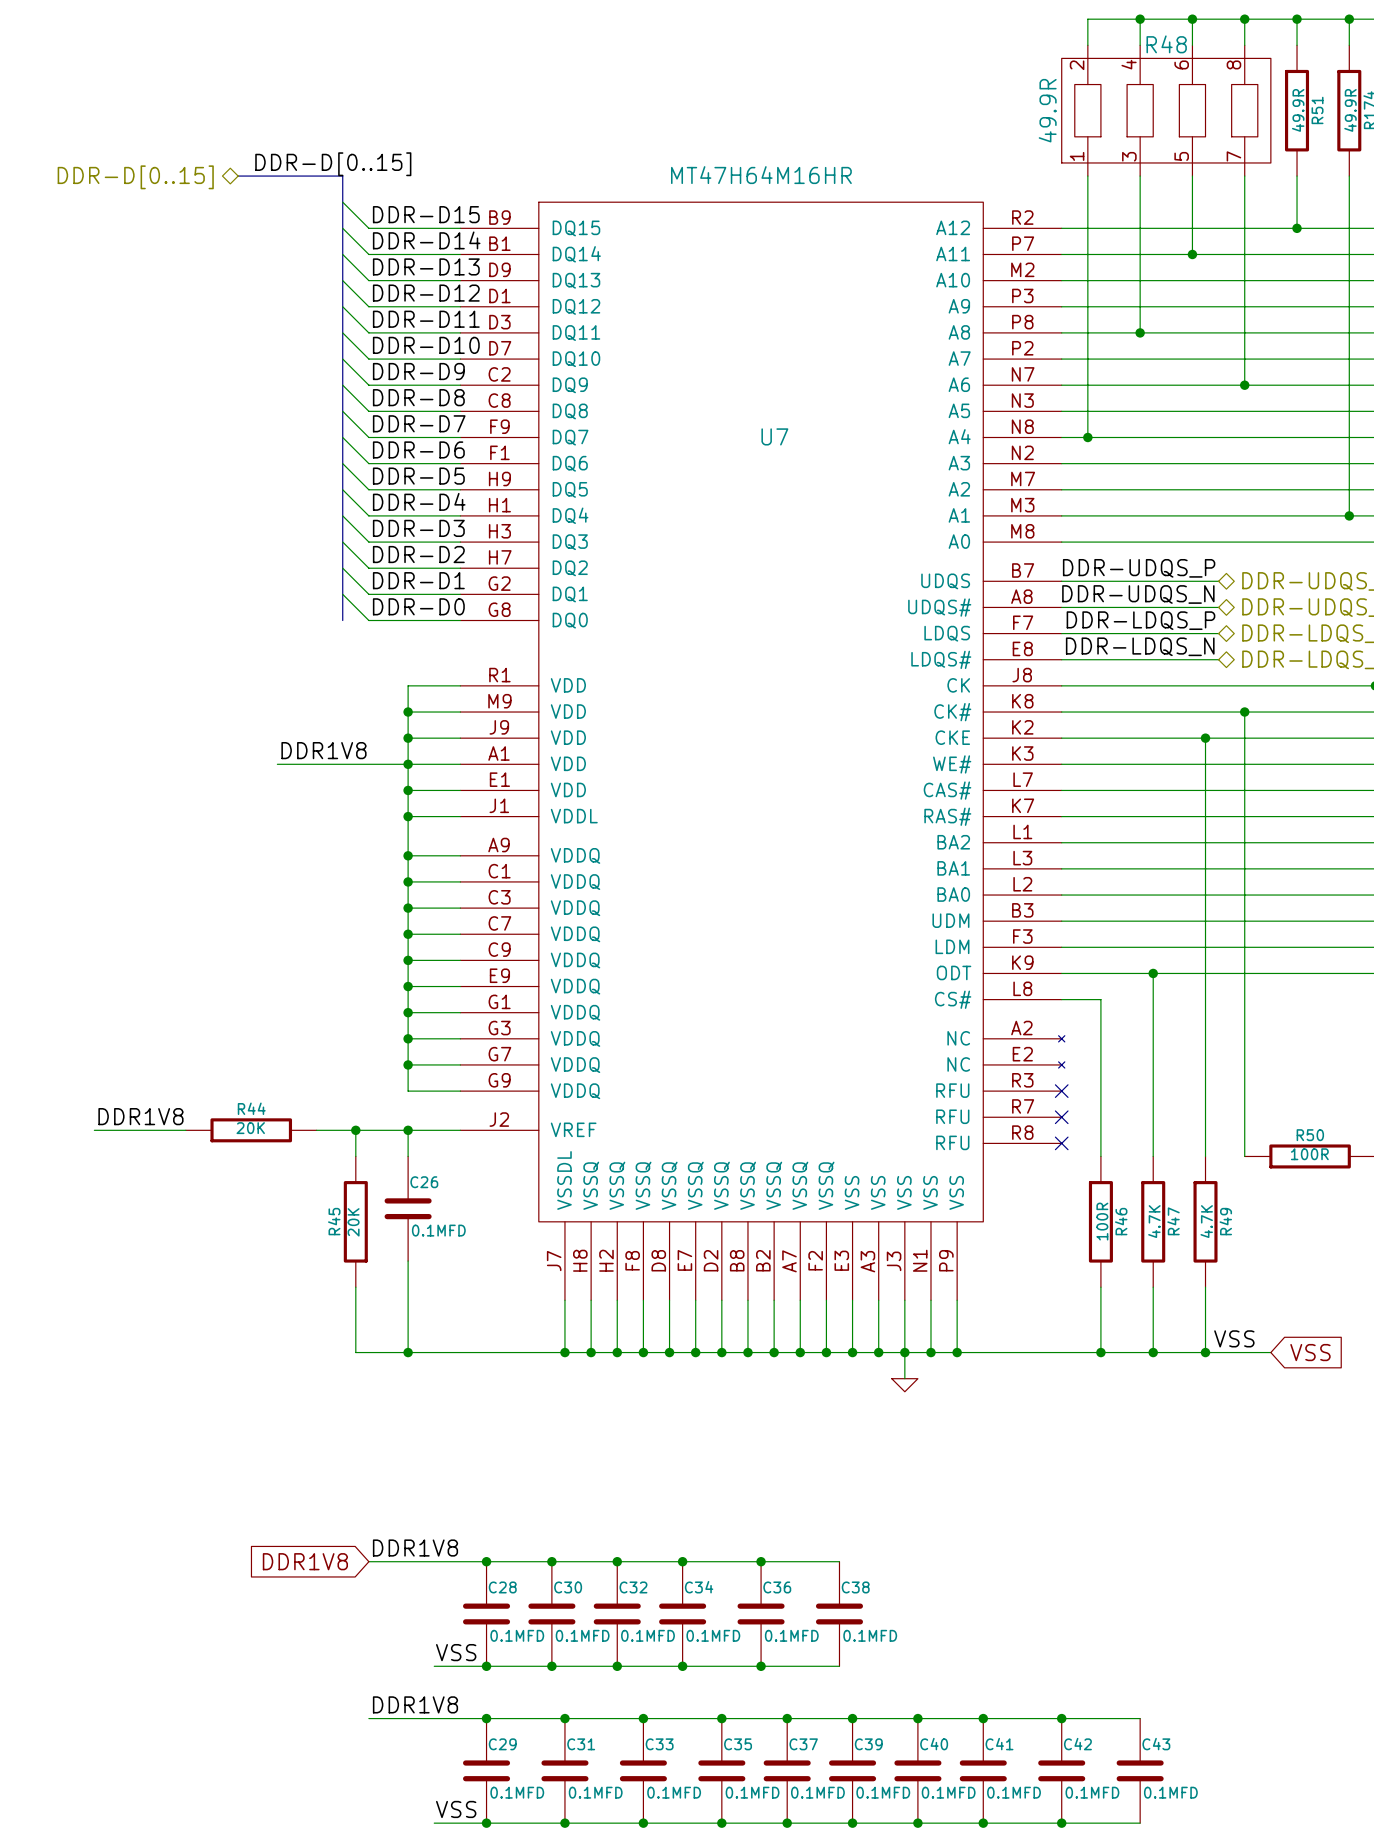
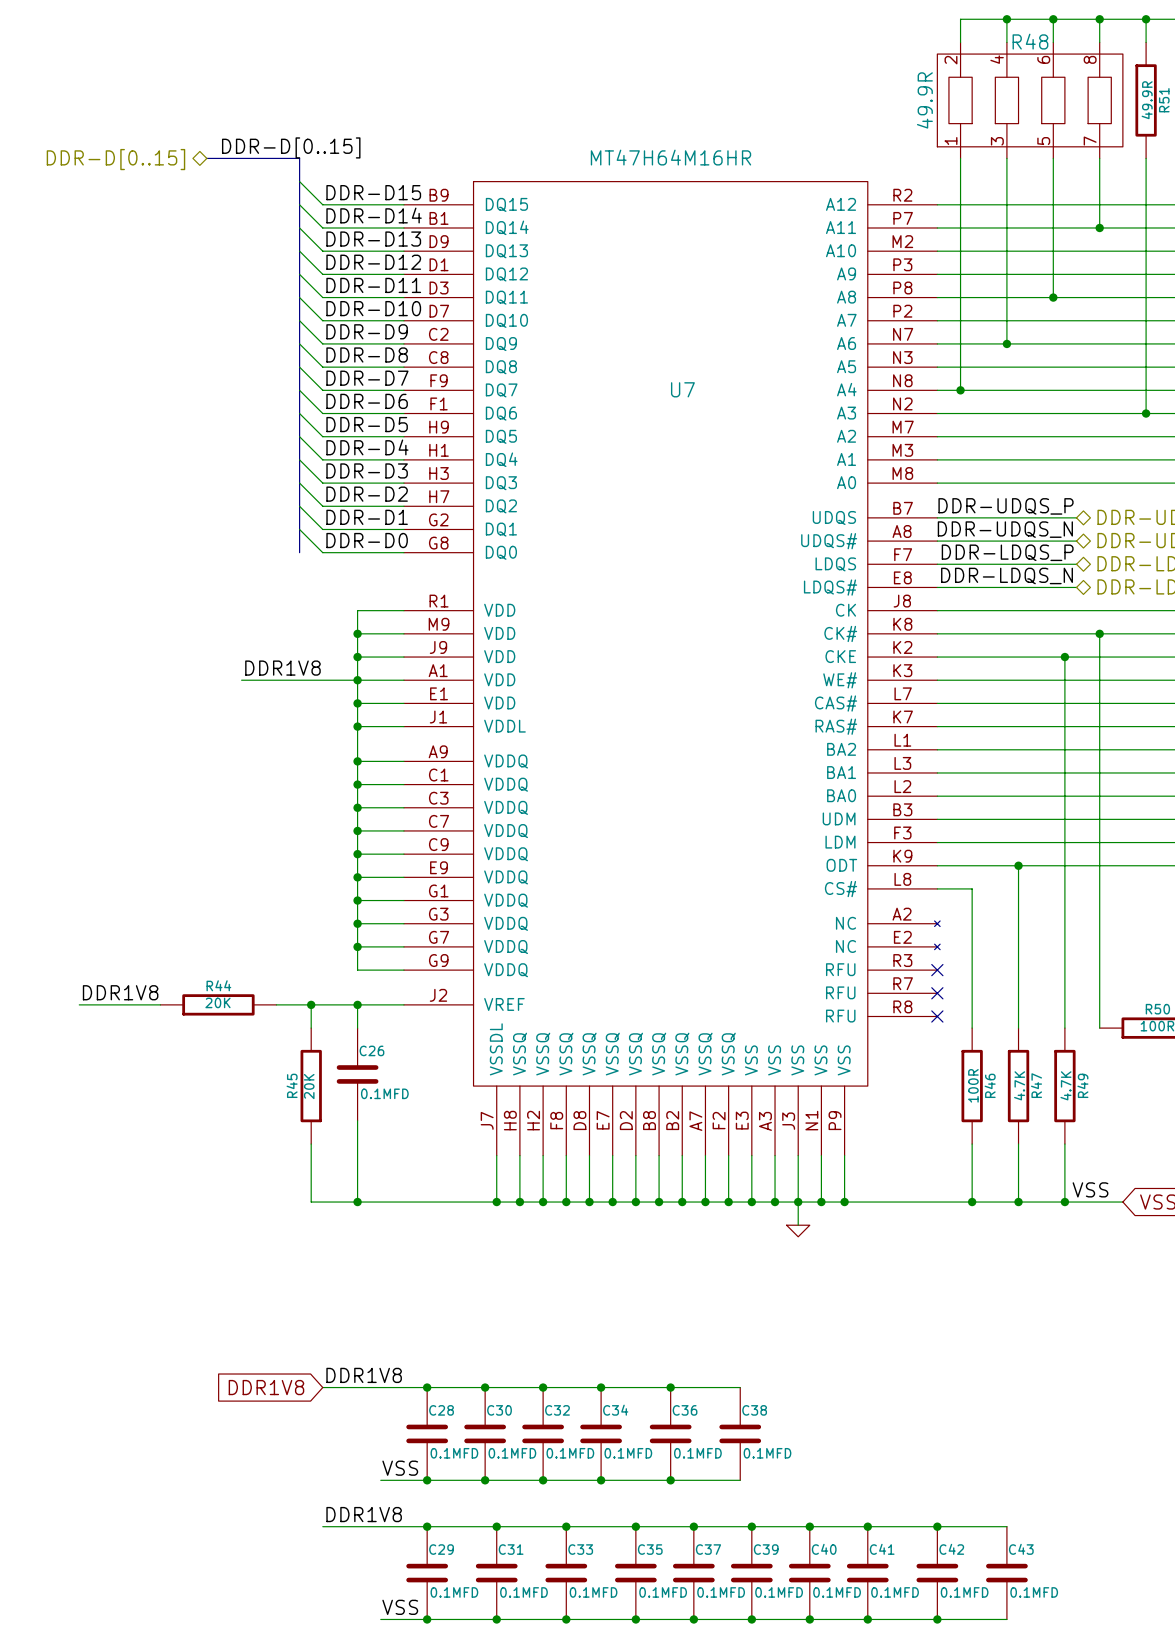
wire: none -> (1146, 204) (1146, 413)
junction: (1297, 228) -> none
wire: none -> (1053, 227) (1053, 297)
junction: (1192, 254) -> none
wire: (1244, 254) (1244, 385) -> none
junction: none -> (1099, 227)
wire: none -> (1006, 297) (1006, 343)
junction: (1140, 332) -> none
junction: none -> (1053, 297)
junction: none -> (1006, 343)
junction: (1244, 385) -> none
junction: none -> (1146, 413)

